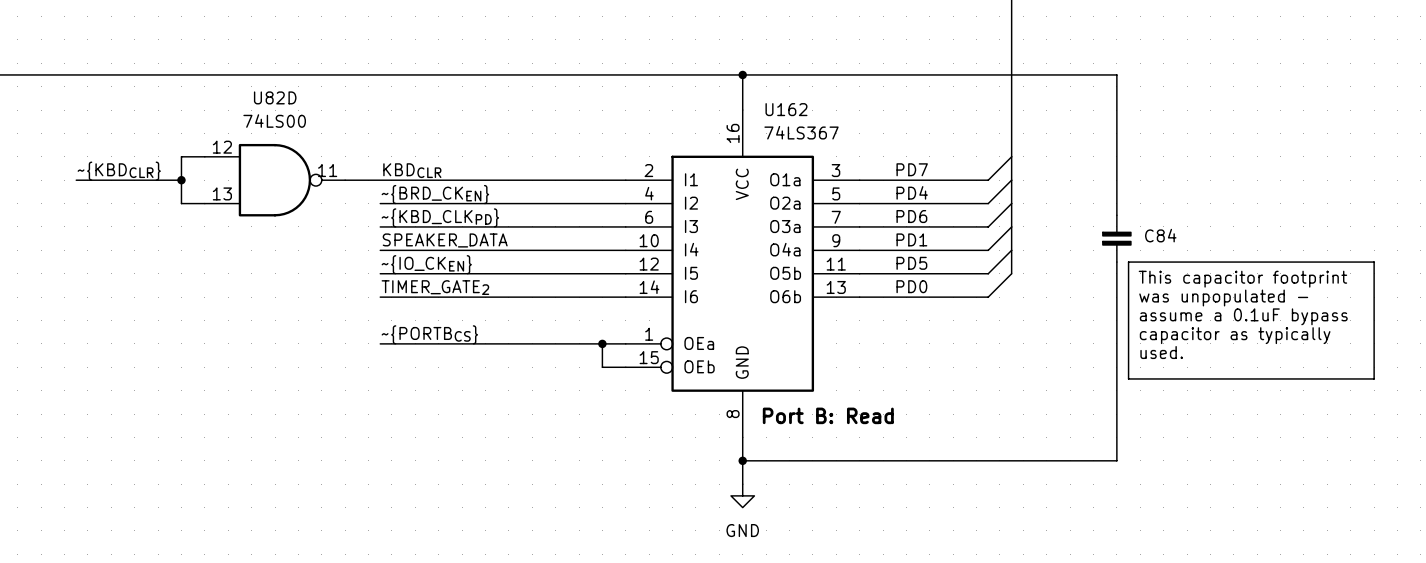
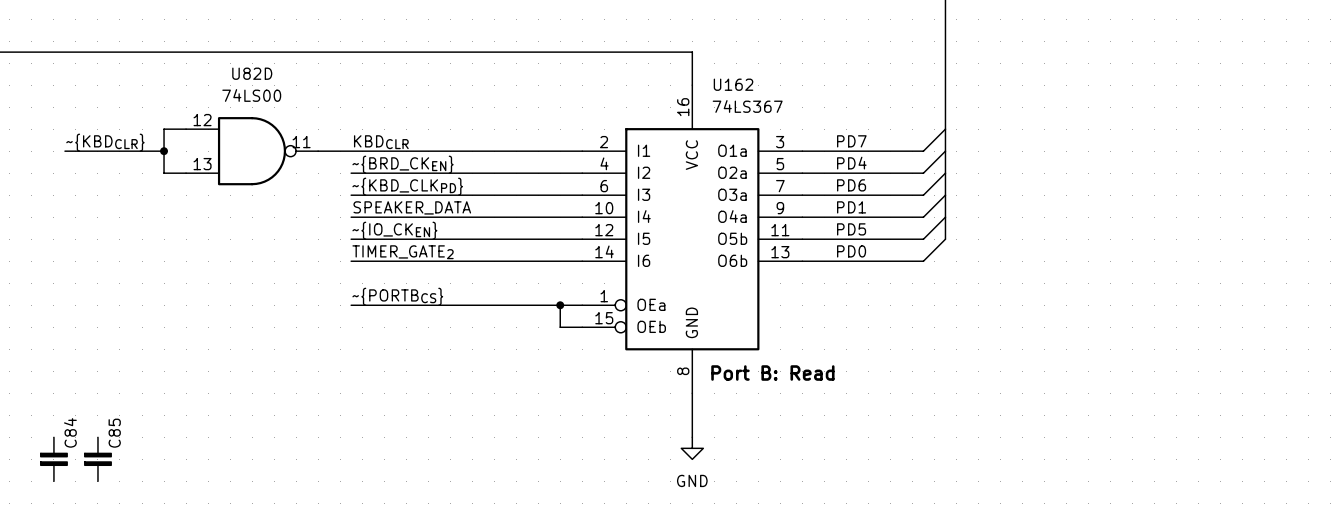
wire: (742, 74) (1116, 74) (1116, 215) -> none
junction: (742, 74) -> none
C84 name rotation: 0° (1160, 235) -> 90° counterclockwise (70, 432)
C84 position: (1116, 238) -> (53, 459)
wire: (1116, 262) (1116, 460) (742, 460) -> none
line: (1128, 262) (1374, 262) (1374, 378) (1128, 378) (1128, 262) -> none
text: This capacitor footprint (1242, 279) -> none
text: was unpopulated - (1223, 297) -> none
text: assume a 0.1uF bypass (1243, 316) -> none
text: capacitor as typically (1235, 335) -> none
text: used. (1161, 352) -> none
junction: (742, 460) -> none
C85: none -> (97, 459)

